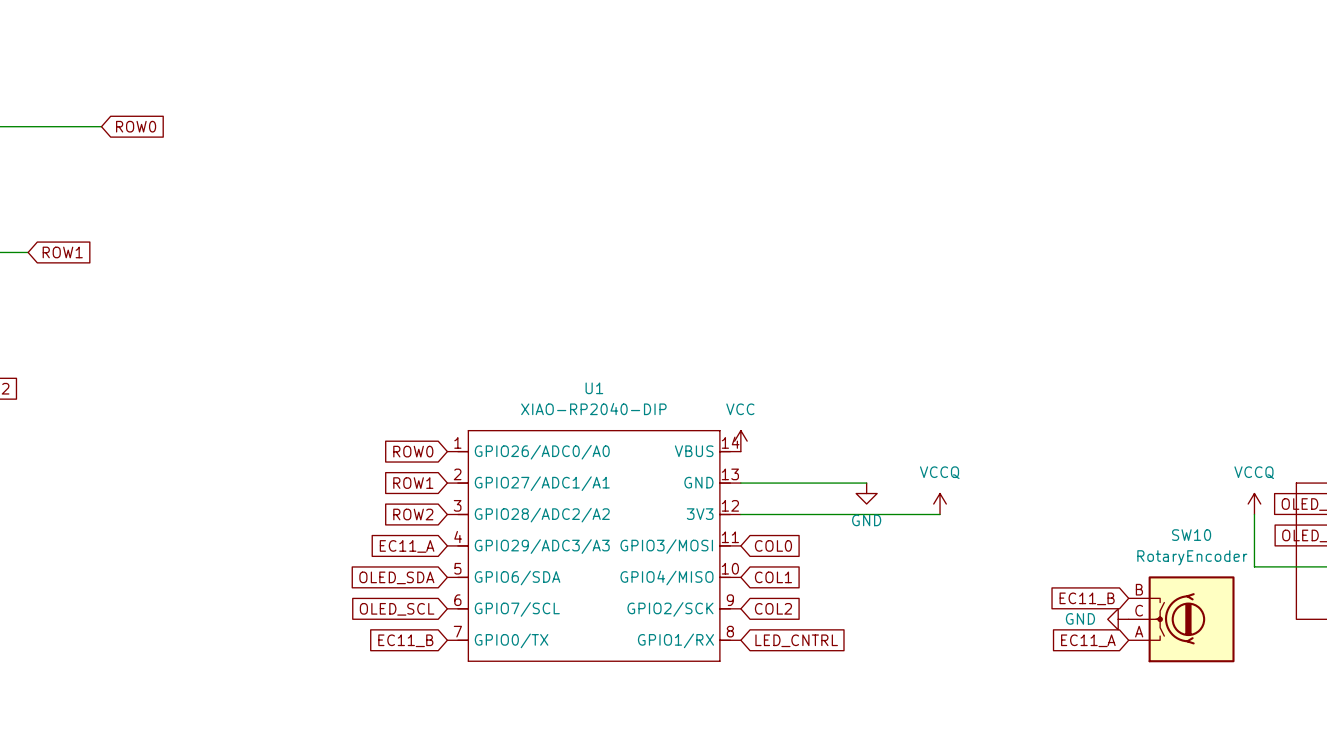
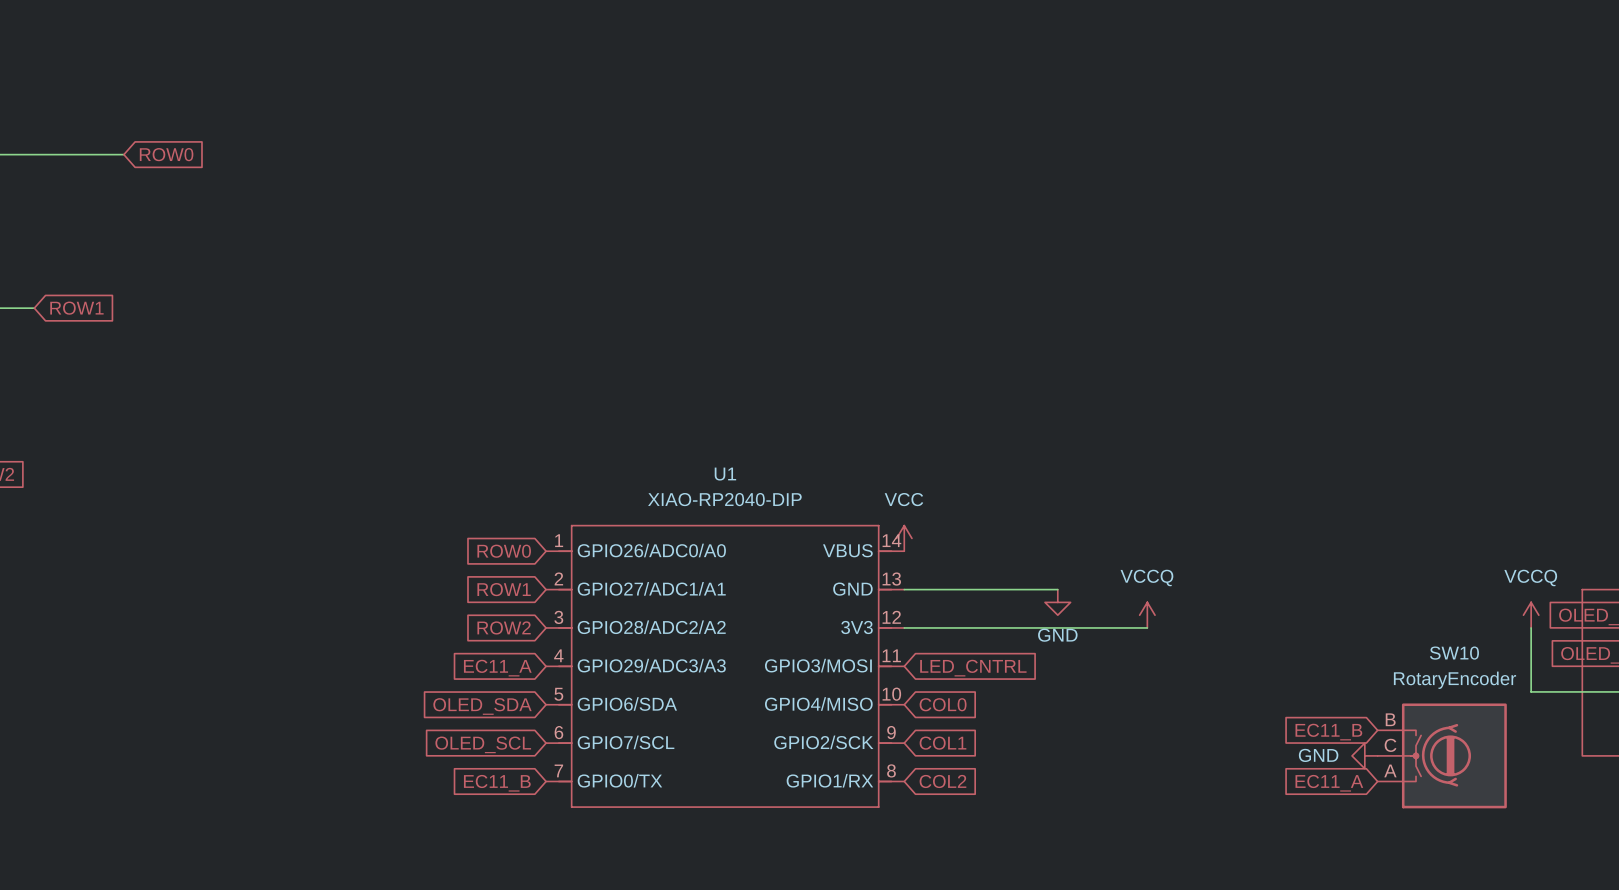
global label: COL0 (773, 545) -> LED_CNTRL (973, 668)
global label: COL1 (773, 577) -> COL0 (943, 704)
global label: COL2 (773, 608) -> COL1 (942, 743)
global label: LED_CNTRL (796, 640) -> COL2 (942, 781)

